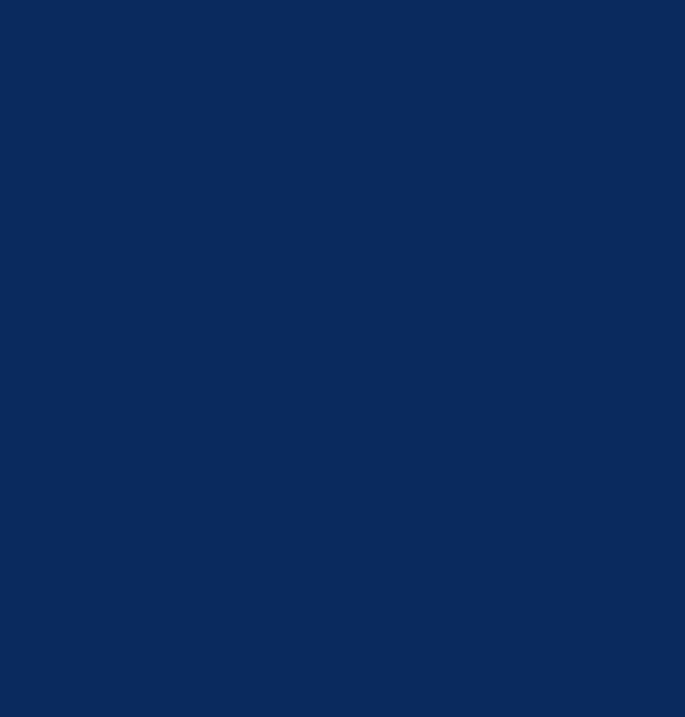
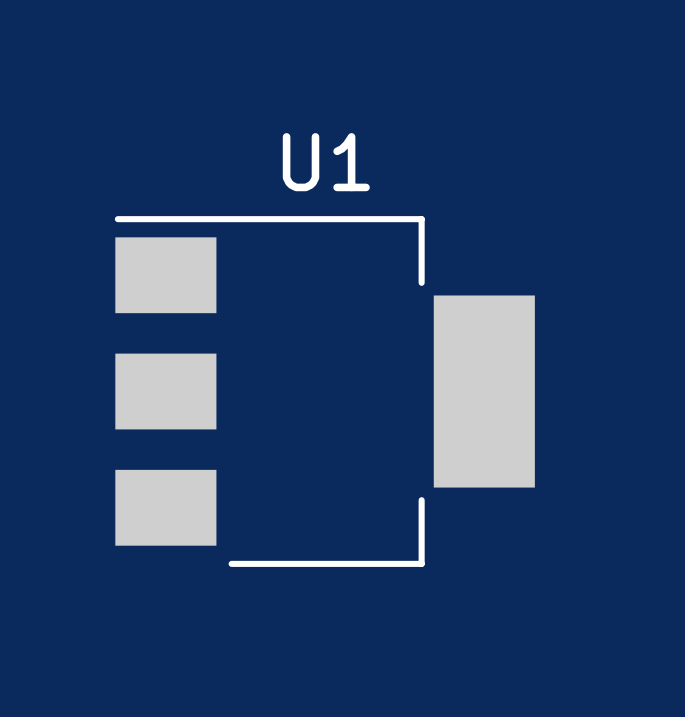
U1: none -> (324, 391)

